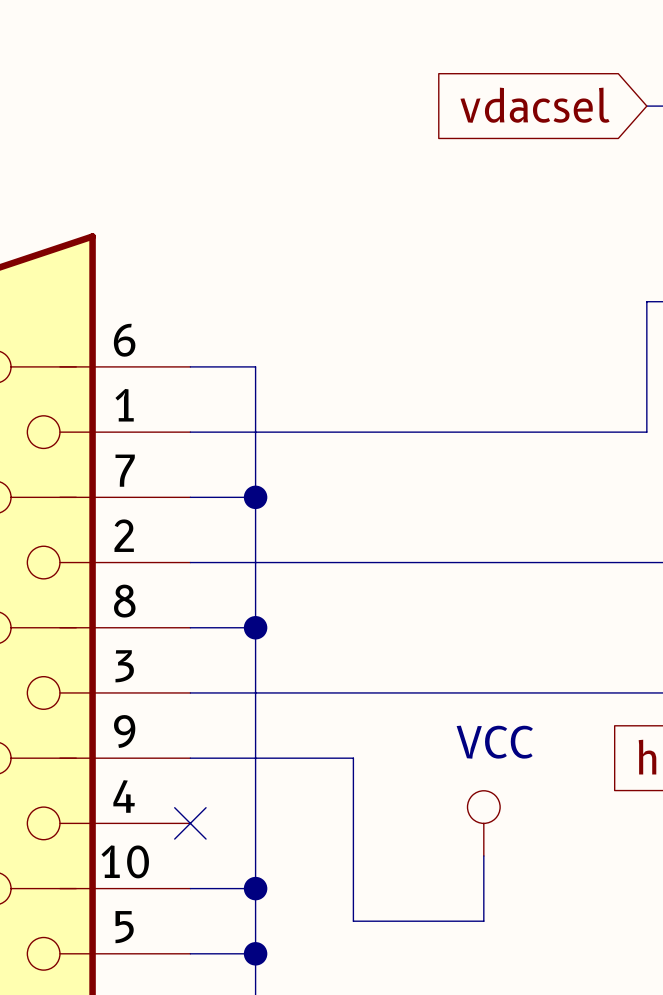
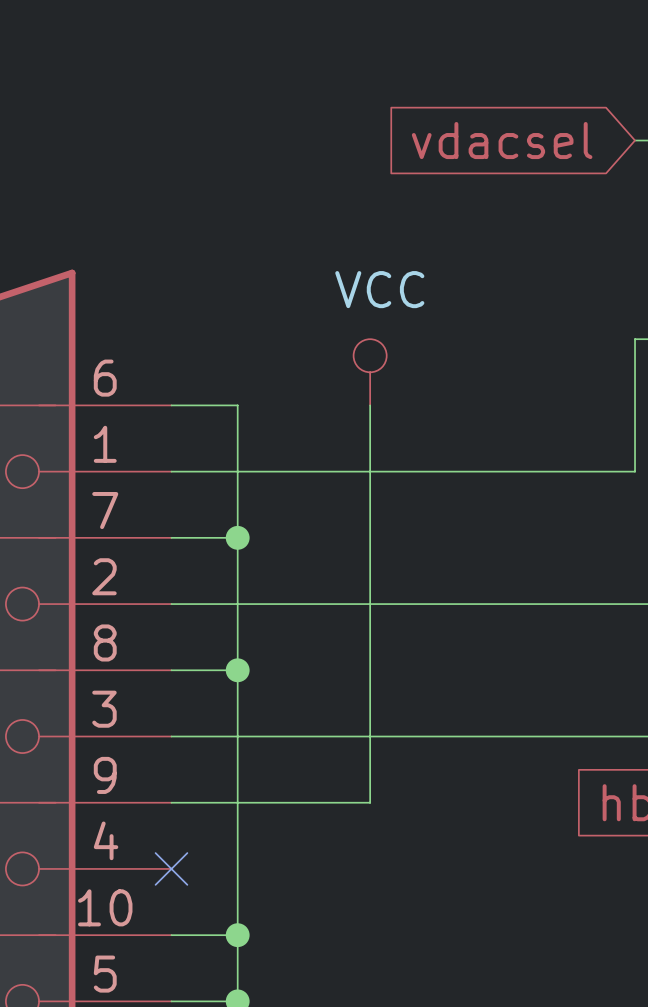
wire: (353, 758) (353, 921) (483, 921) (483, 855) -> (337, 802) (370, 802) (370, 405)
power symbol position: VCC (483, 823) -> VCC (370, 372)

